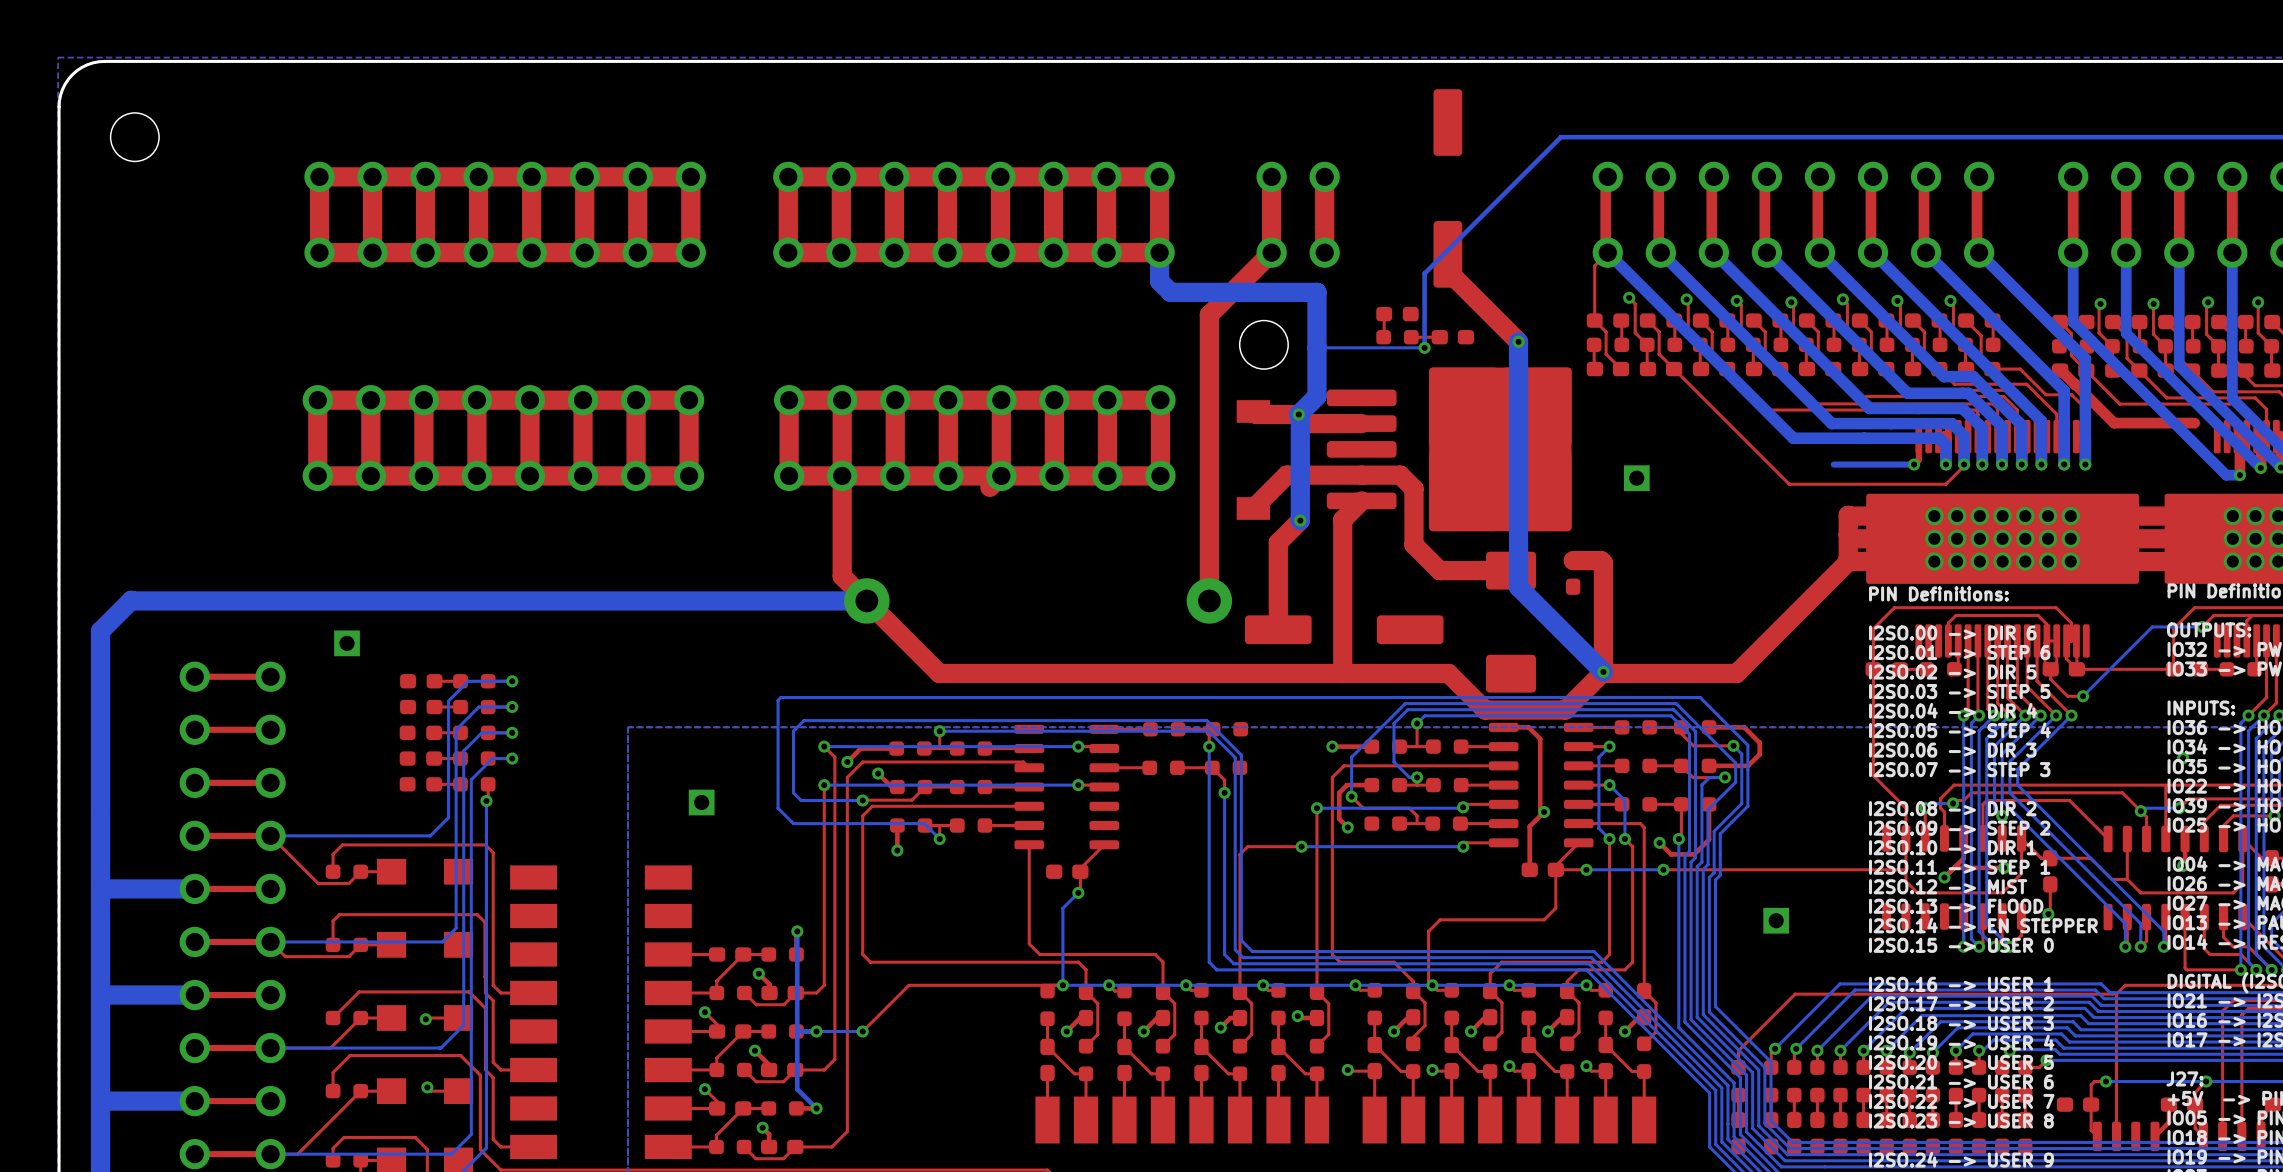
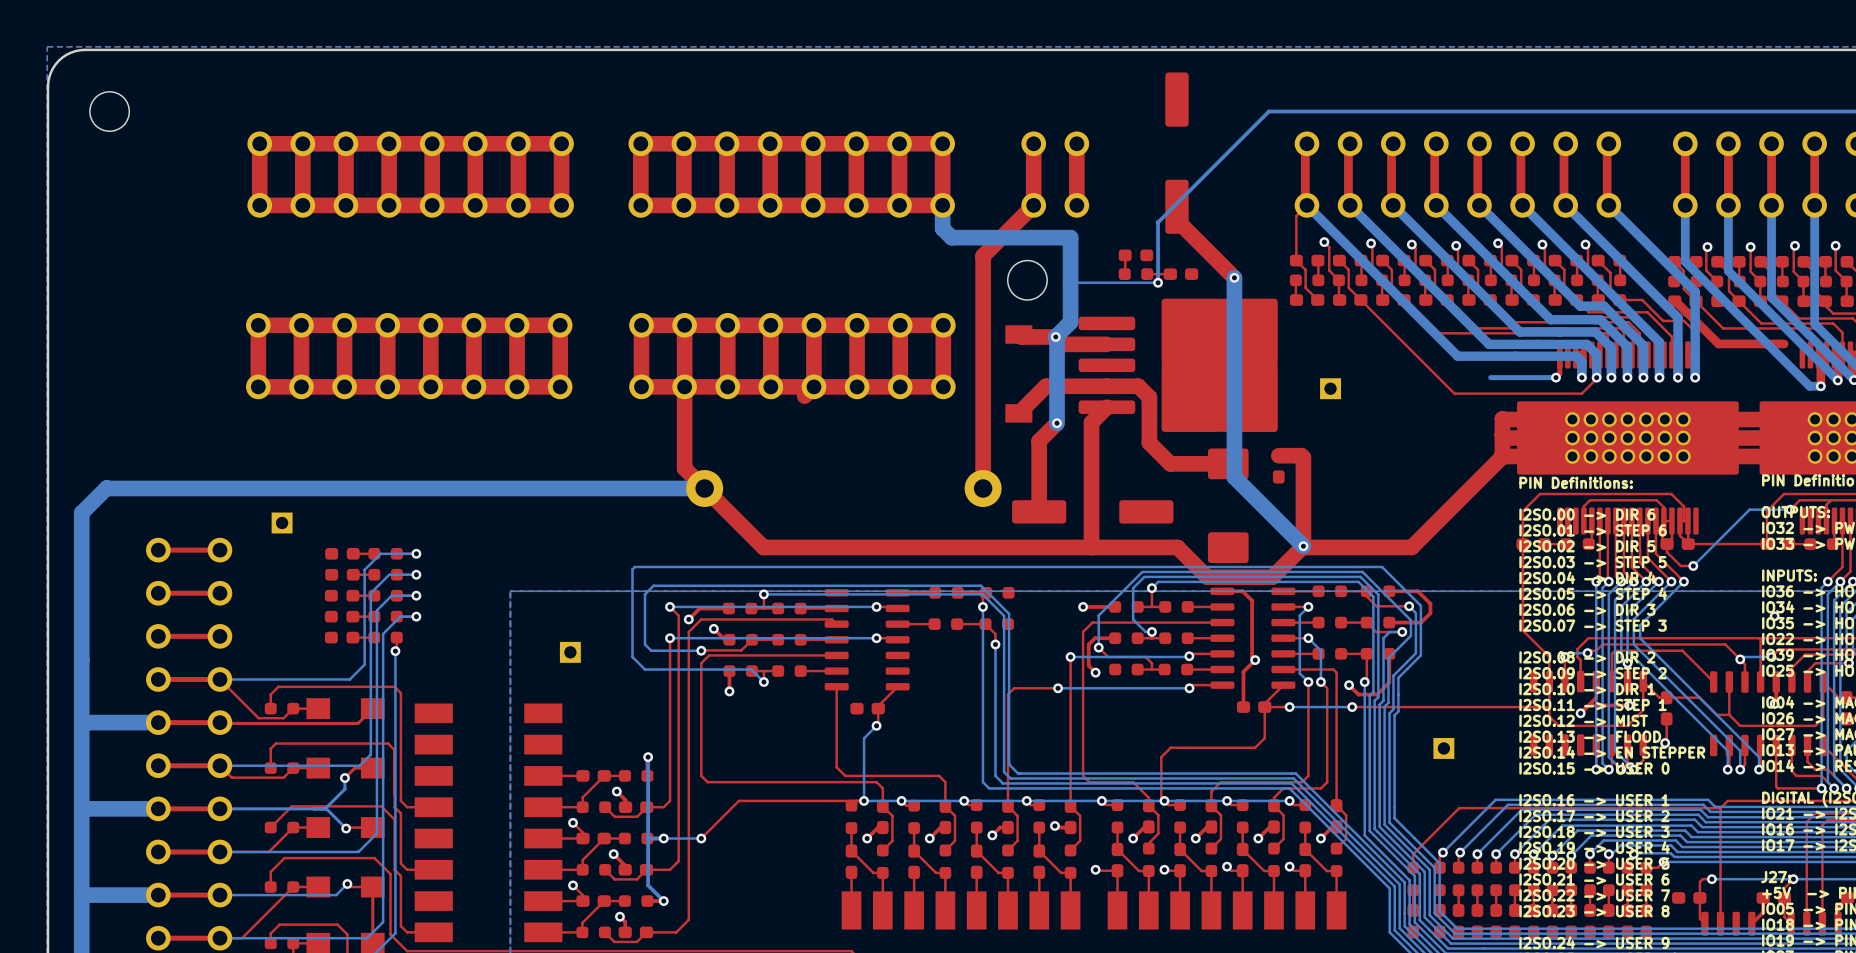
top track: none -> (372, 708) (357, 723) (219, 722)
top track: none -> (372, 768) (354, 768) (344, 778)
bottom track: none -> (344, 778) (344, 789) (325, 808)
via: none -> (344, 778)
bottom track: none -> (219, 808) (326, 808) (346, 828)
bottom track: none -> (347, 883) (336, 895) (219, 895)
top track: none -> (372, 887) (372, 943)

